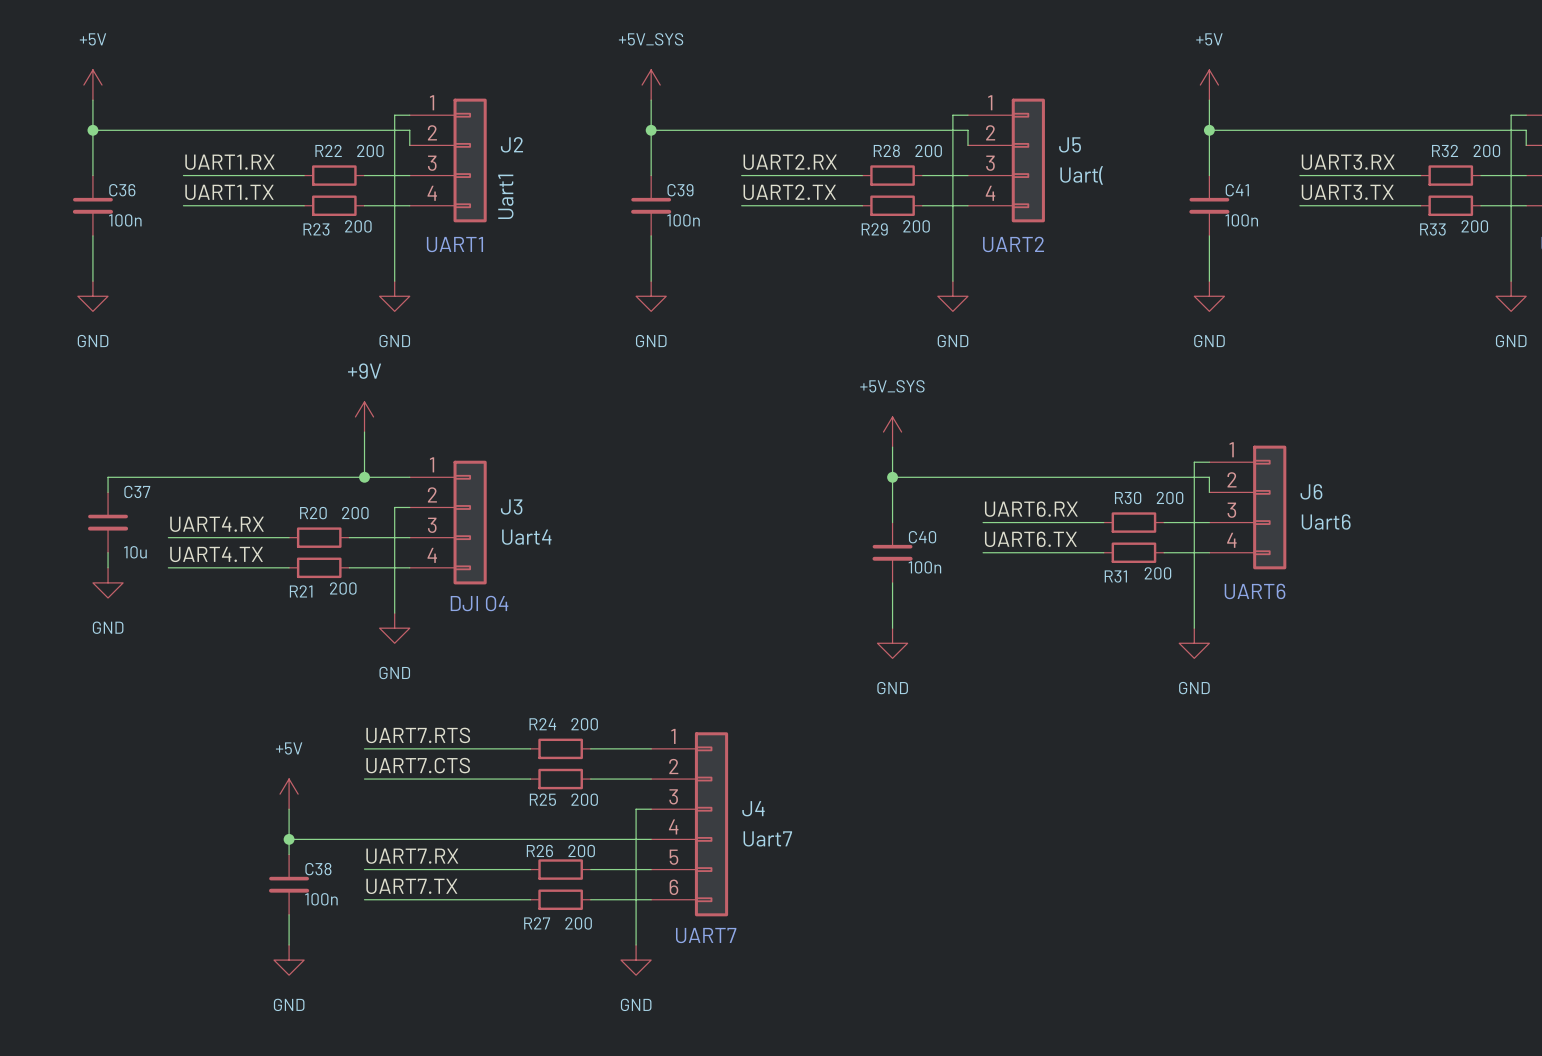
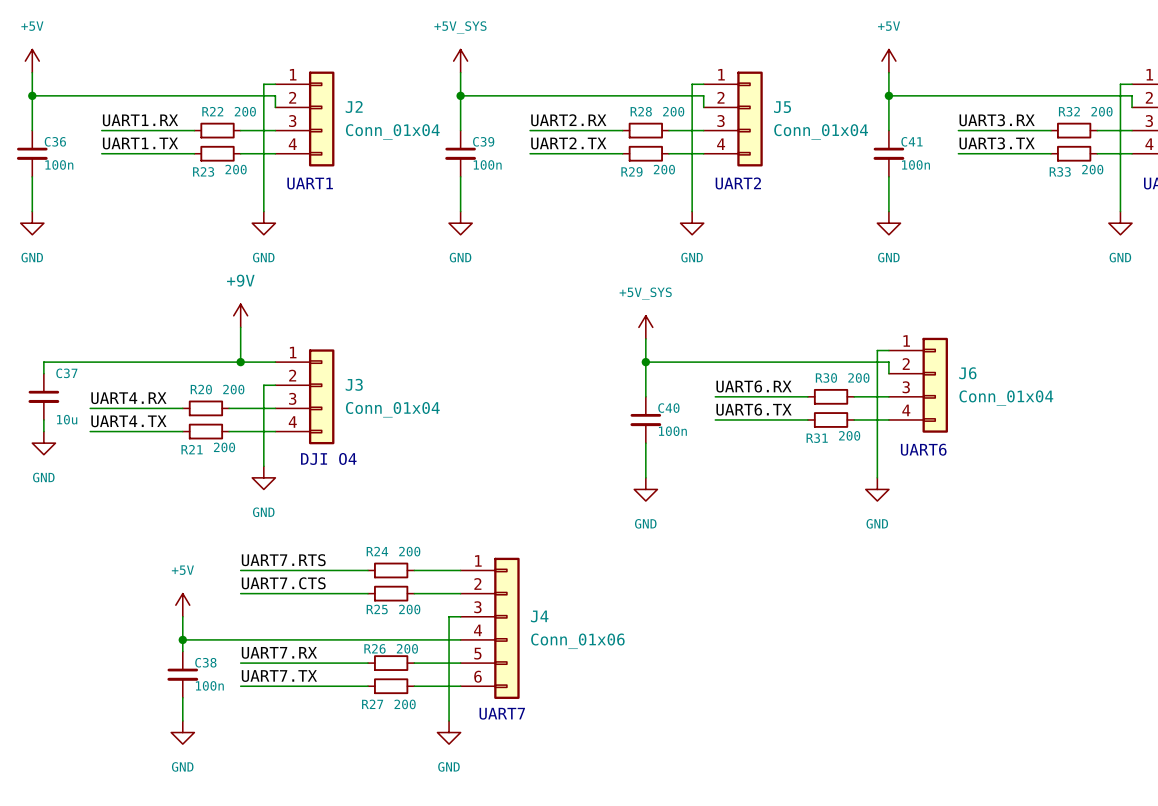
J5 value: Uart( (1081, 175) -> Conn_01x04 (821, 131)
J2 value: Uart1 (505, 196) -> Conn_01x04 (392, 131)
J6 value: Uart6 (1326, 522) -> Conn_01x04 (1006, 398)
J3 value: Uart4 (526, 537) -> Conn_01x04 (392, 409)
J4 value: Uart7 (767, 838) -> Conn_01x06 (577, 641)

